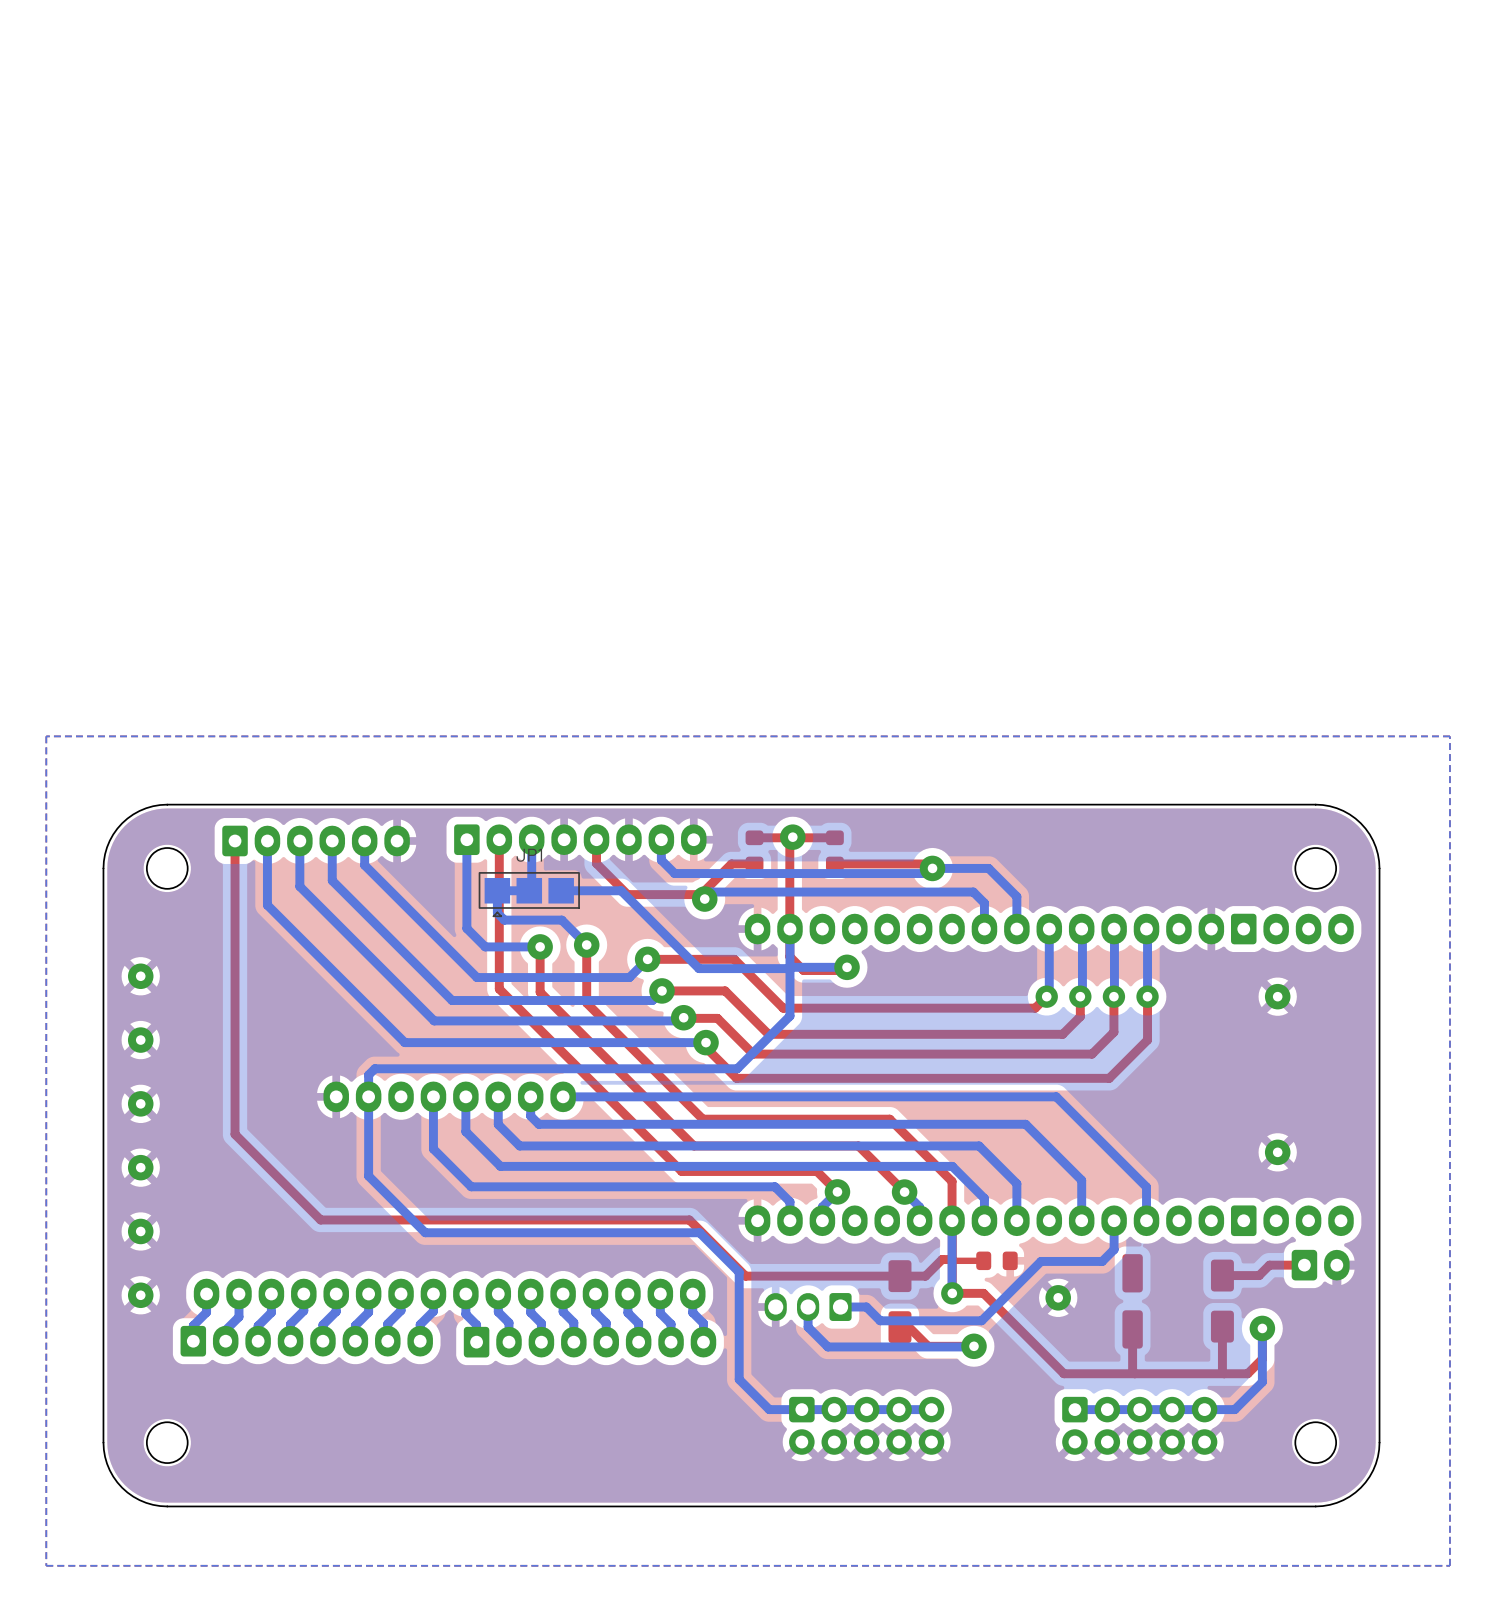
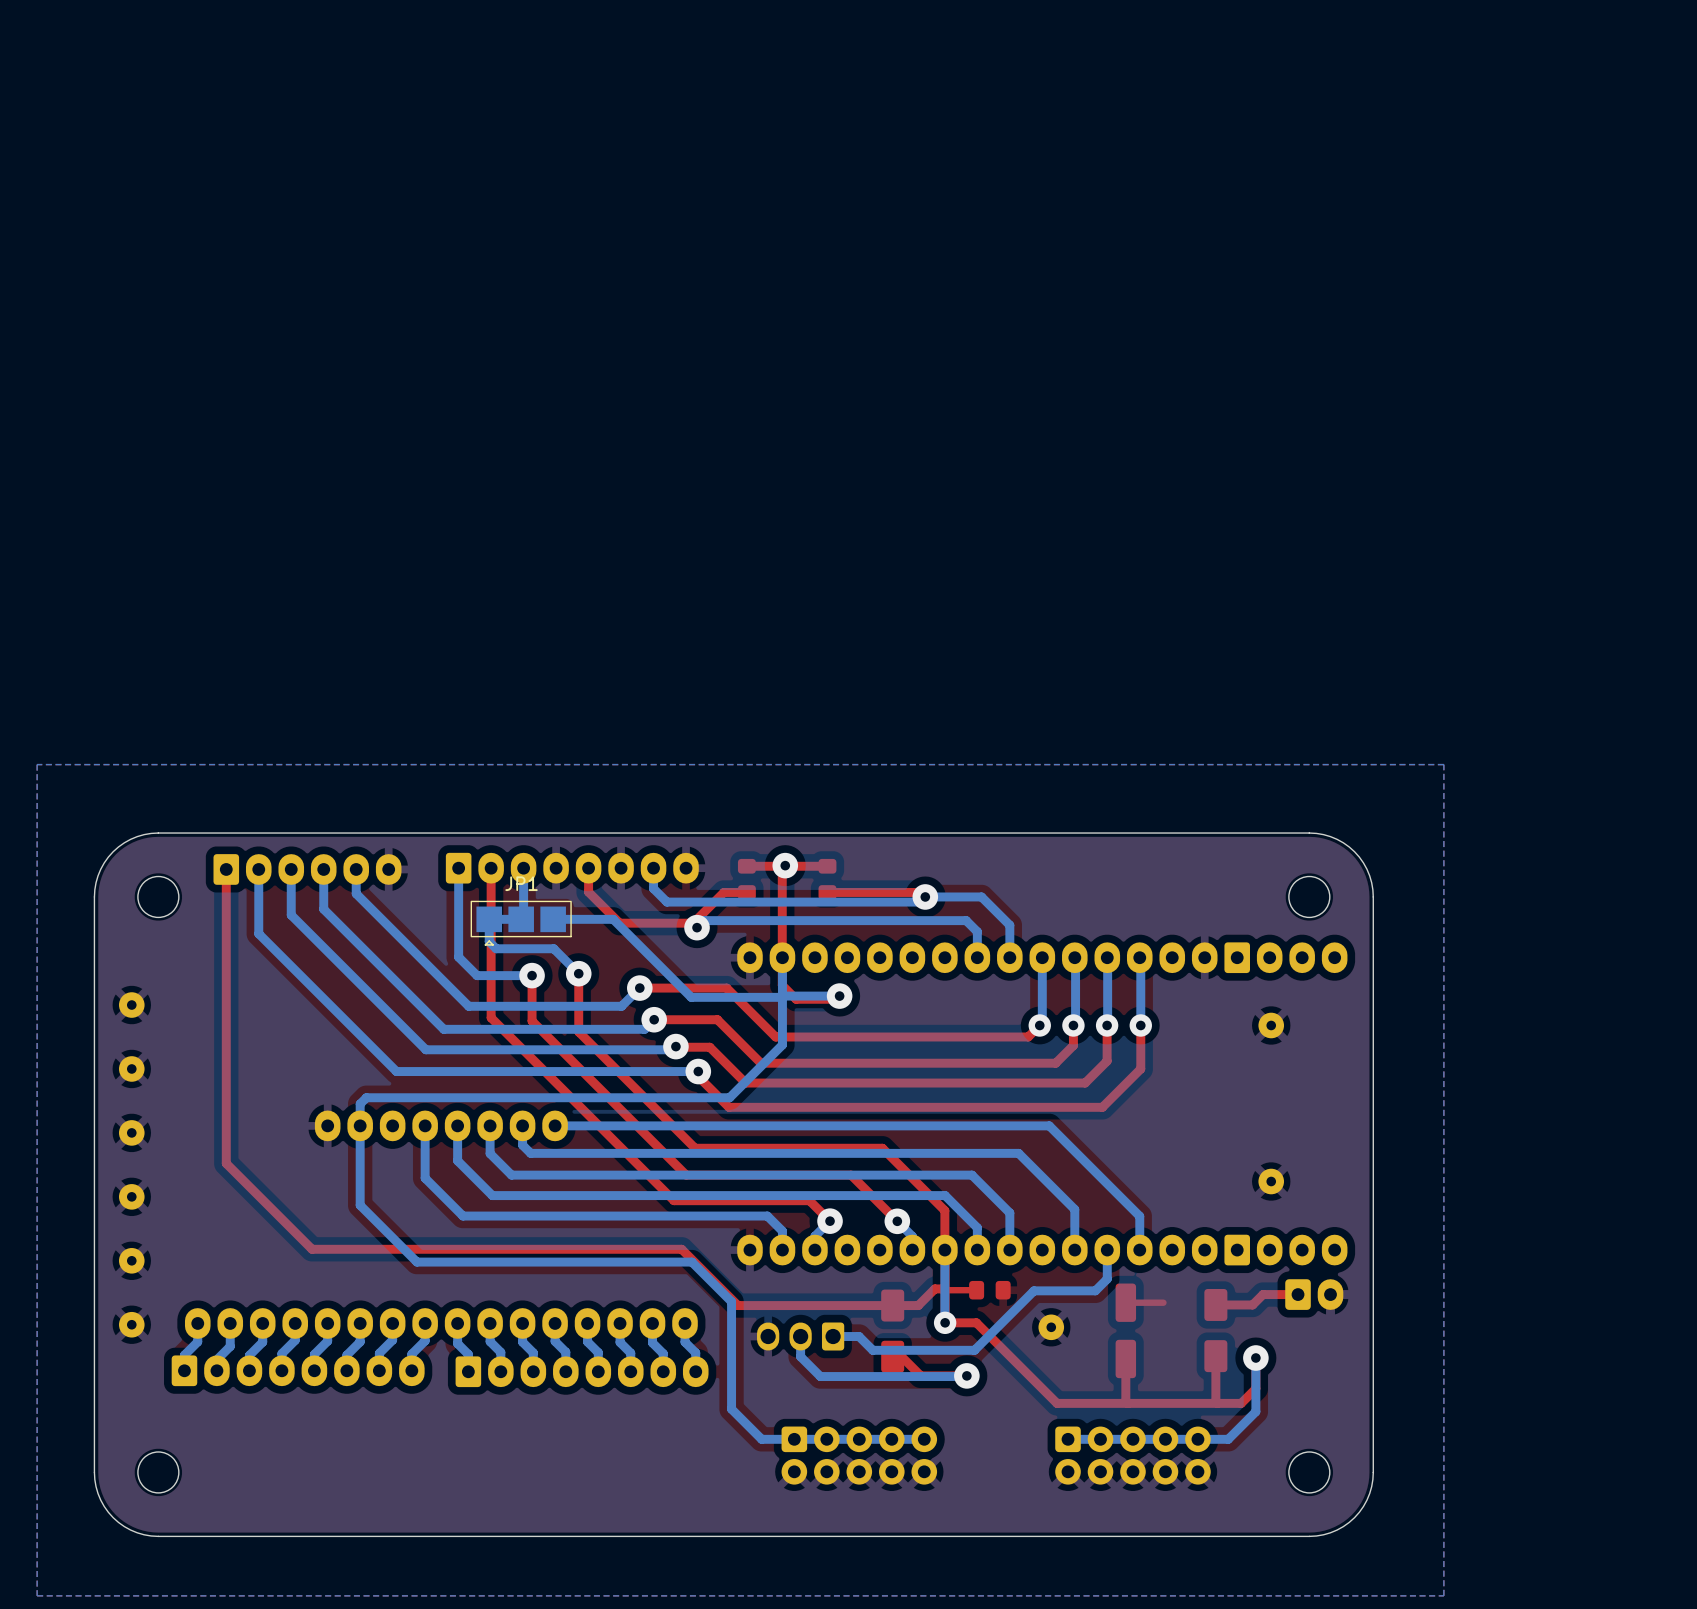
top track: none -> (1163, 1302) (1125, 1302)

